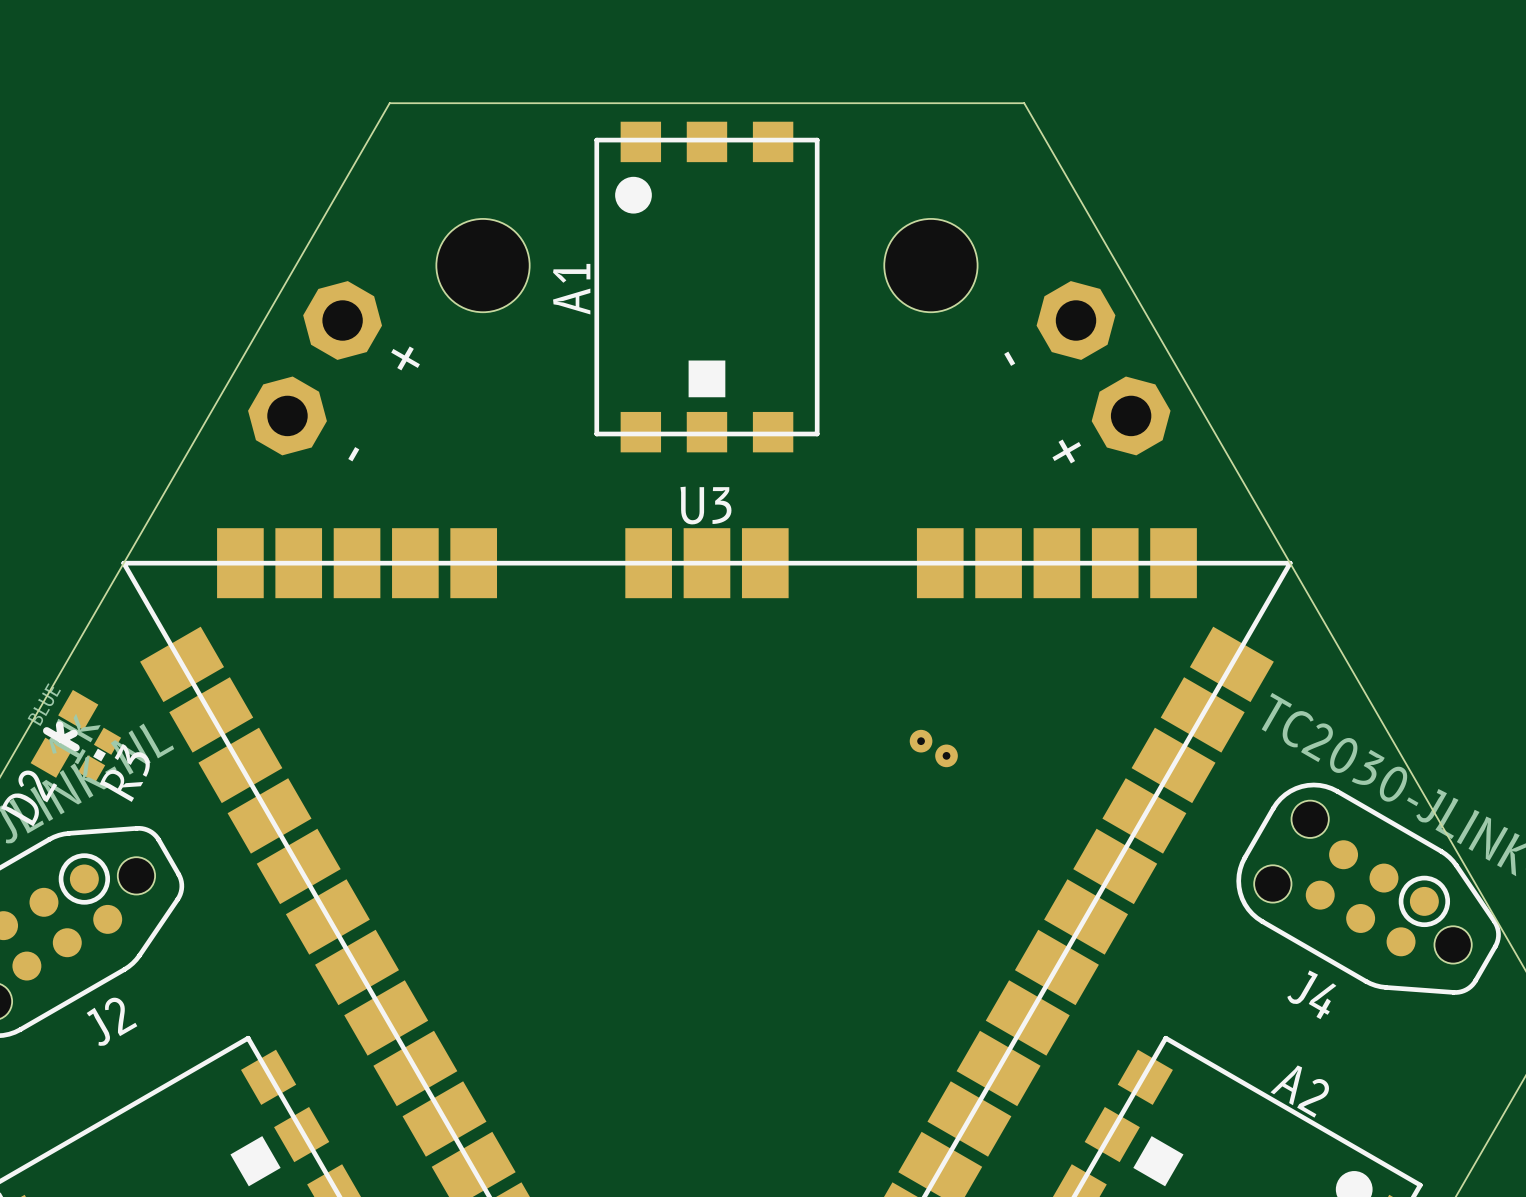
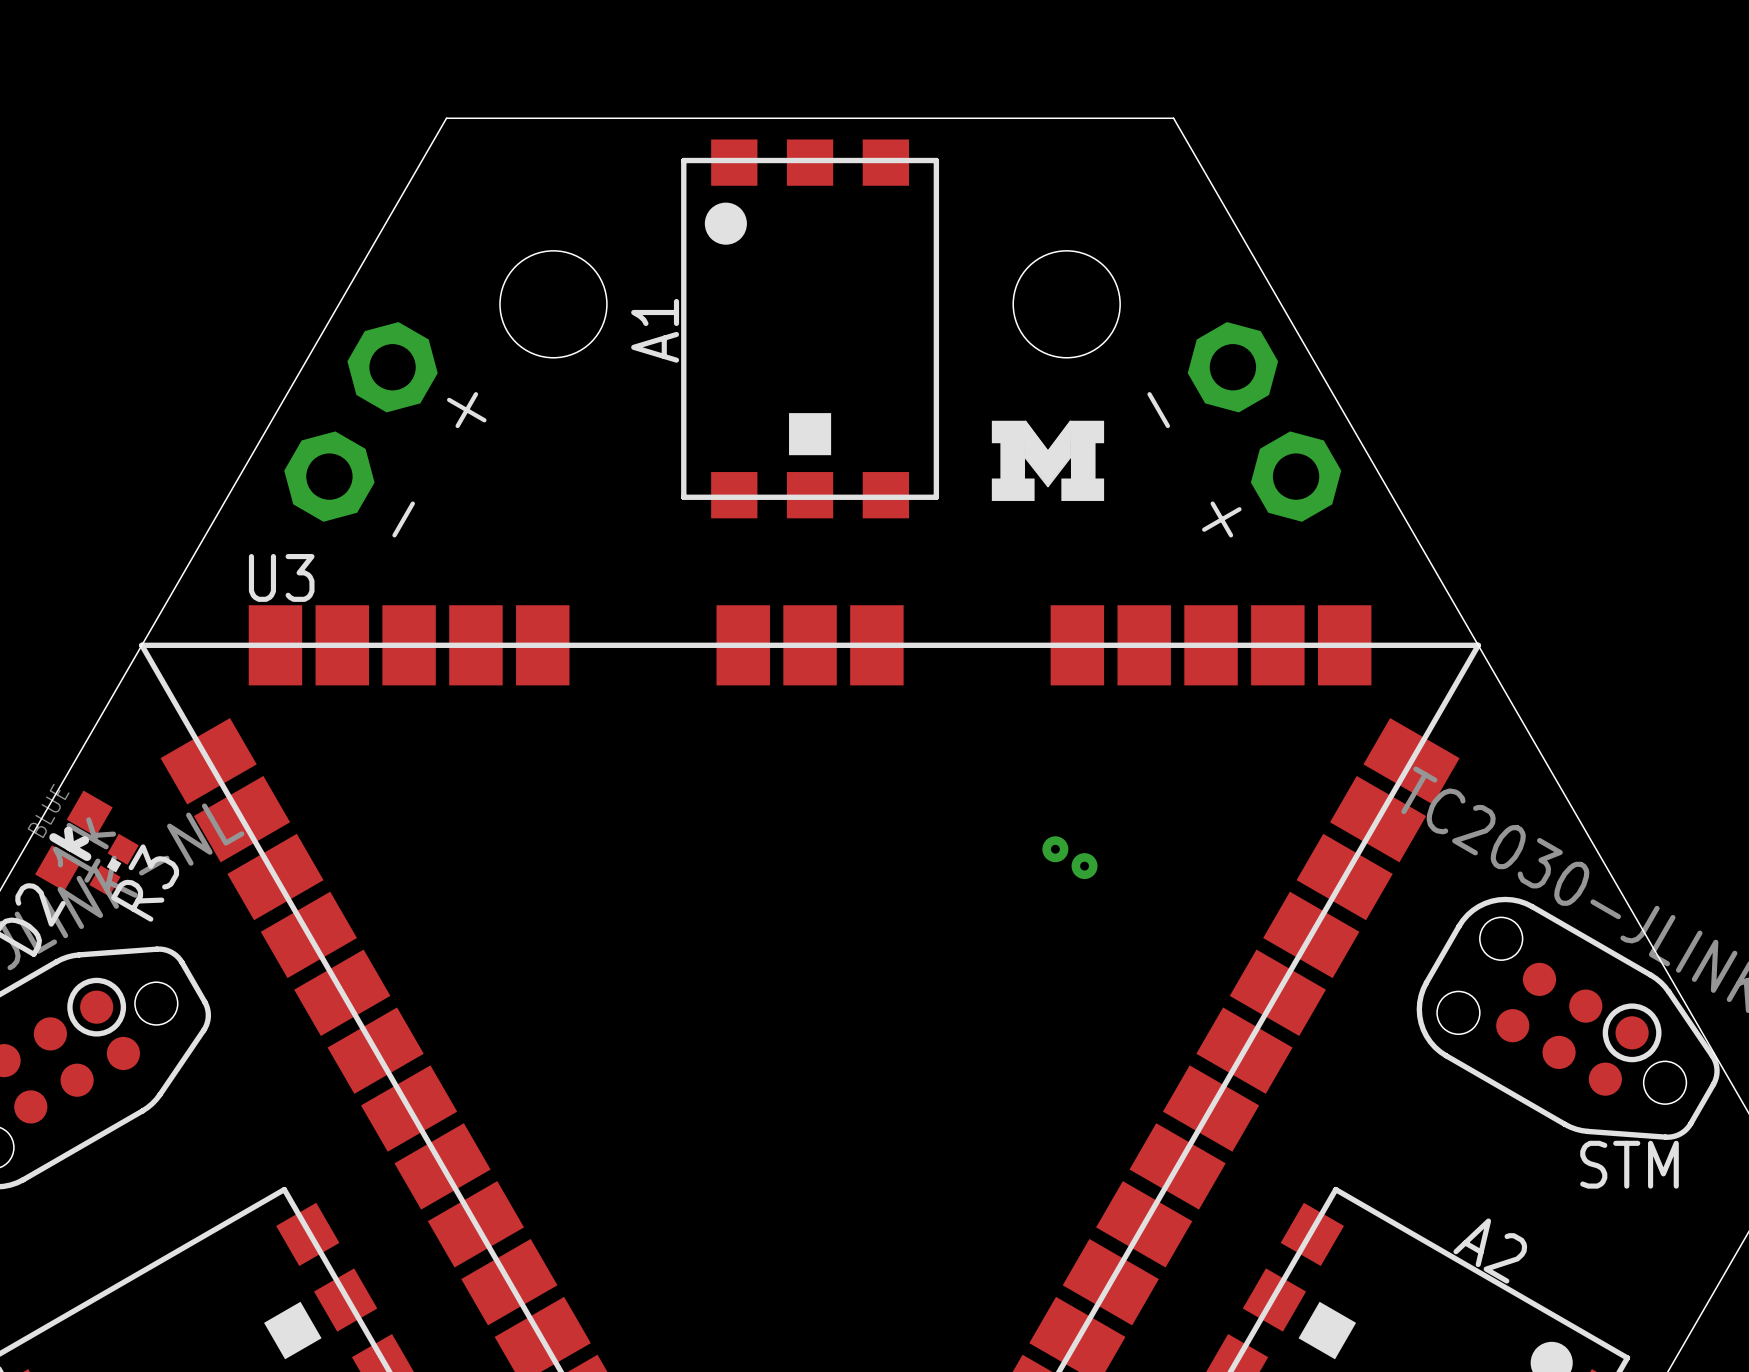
drawing: none -> [991, 420, 1105, 501]
U3 name position: U3 (705, 505) -> U3 (281, 577)
J4 name: J4 (1311, 994) -> none
text: none -> STM (1629, 1164)
J2 name: J2 (112, 1022) -> none

